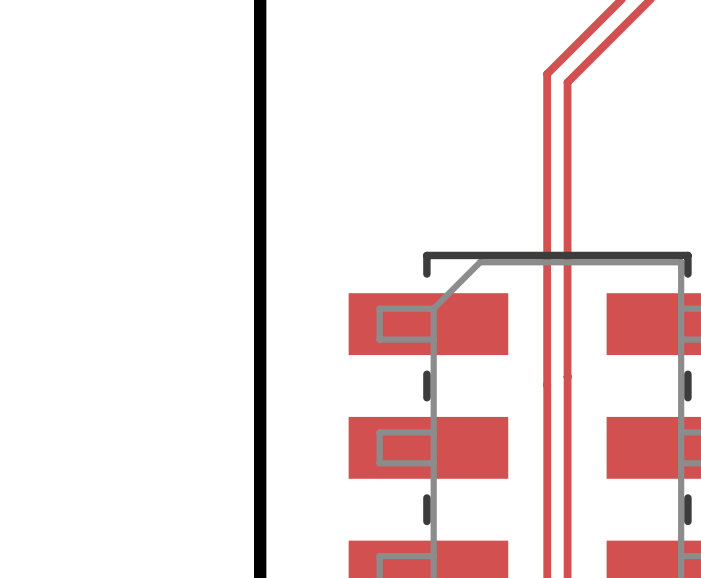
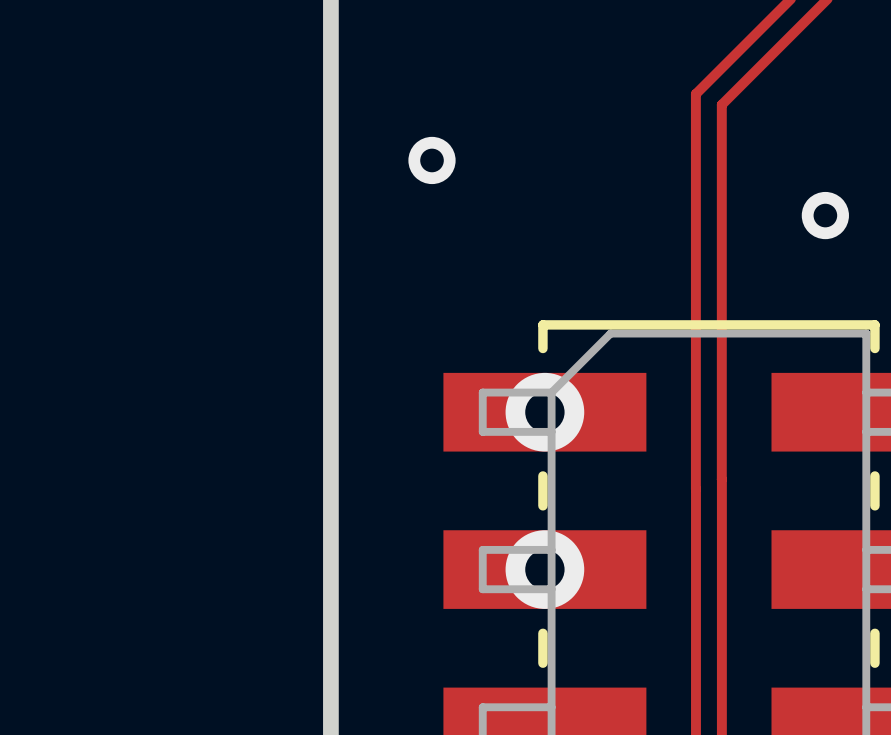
via: none -> (432, 160)
via: none -> (825, 215)
via: none -> (544, 412)
via: none -> (544, 569)

